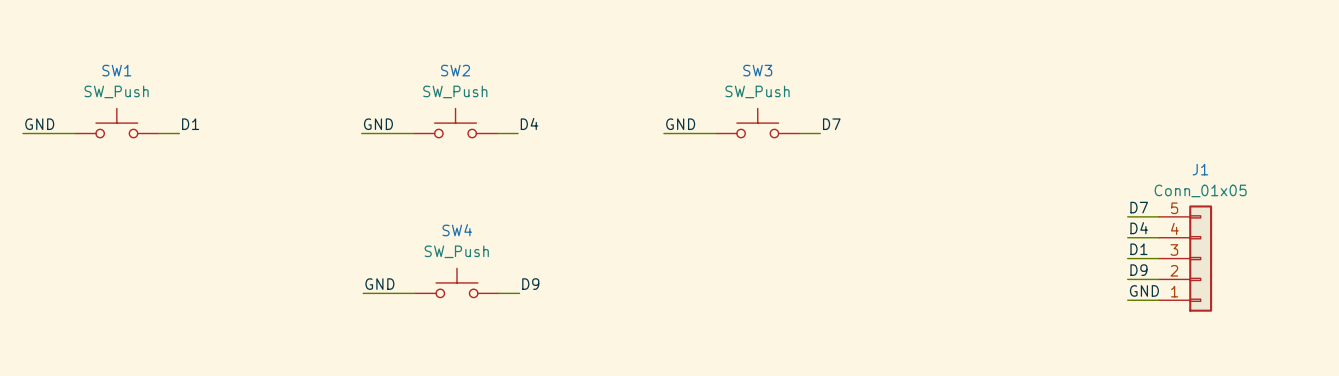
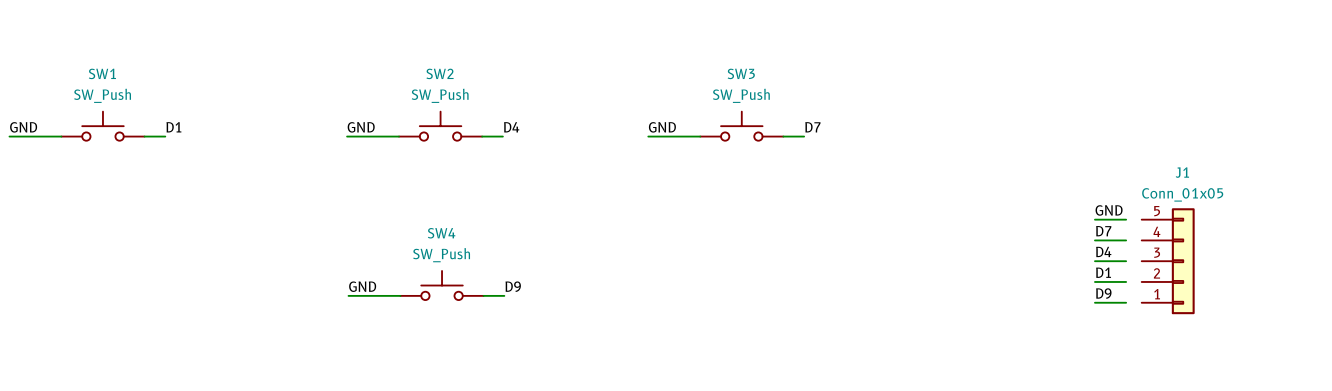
label position: D7 (1139, 207) -> D7 (1103, 231)
wire: (1143, 216) (1158, 216) -> (1094, 219) (1110, 219)
label position: D4 (1139, 228) -> D4 (1103, 251)
wire: (1143, 237) (1158, 237) -> (1094, 240) (1110, 240)
label position: D1 (1138, 249) -> D1 (1103, 272)
wire: (1143, 258) (1158, 258) -> (1094, 261) (1110, 261)
label position: D9 (1138, 270) -> D9 (1103, 293)
wire: (1143, 279) (1158, 279) -> (1094, 281) (1110, 281)
label position: GND (1144, 290) -> GND (1109, 210)
wire: (1143, 300) (1158, 300) -> (1094, 302) (1110, 302)

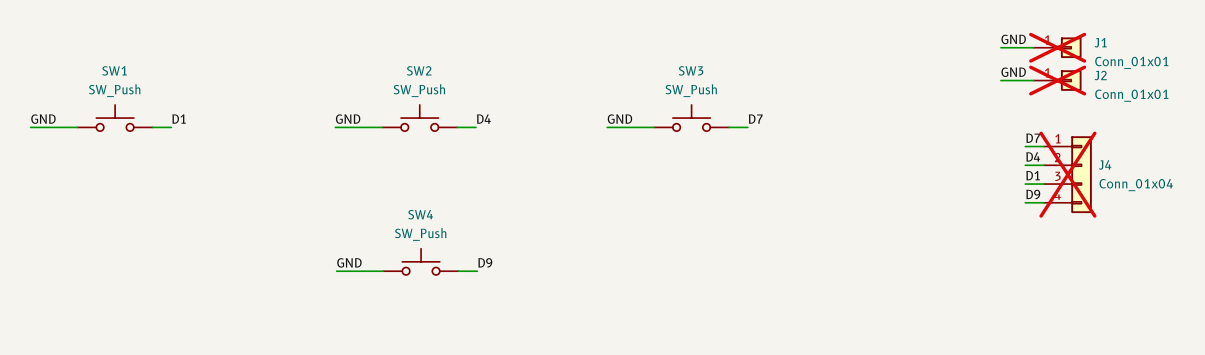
label: none -> GND (1013, 39)
wire: none -> (1000, 47) (1033, 47)
J1 do-not-place cross: none -> (1057, 47)
label: none -> GND (1013, 72)
wire: none -> (1000, 80) (1033, 80)
J2: none -> Conn_01x01 (1057, 80)
wire: none -> (1025, 146) (1044, 146)
J1 name position: J1 (1182, 172) -> J1 (1100, 42)
wire: none -> (1025, 165) (1044, 165)
J4: none -> Conn_01x04 (1067, 174)
J1 value: Conn_01x05 (1182, 194) -> Conn_01x01 (1131, 62)
wire: none -> (1025, 184) (1044, 184)
J1 symbol: [1141, 208, 1195, 315] -> [1033, 37, 1082, 59]
label: GND (1109, 210) -> none
wire: (1094, 219) (1126, 219) -> none
label position: D7 (1103, 231) -> D7 (1033, 138)
wire: (1094, 240) (1126, 240) -> none
label position: D4 (1103, 251) -> D4 (1033, 156)
wire: (1094, 261) (1126, 261) -> none
label position: D1 (1103, 272) -> D1 (1033, 175)
wire: (1094, 281) (1126, 281) -> none
label position: D9 (1103, 293) -> D9 (1033, 194)
wire: (1094, 302) (1126, 302) -> none

